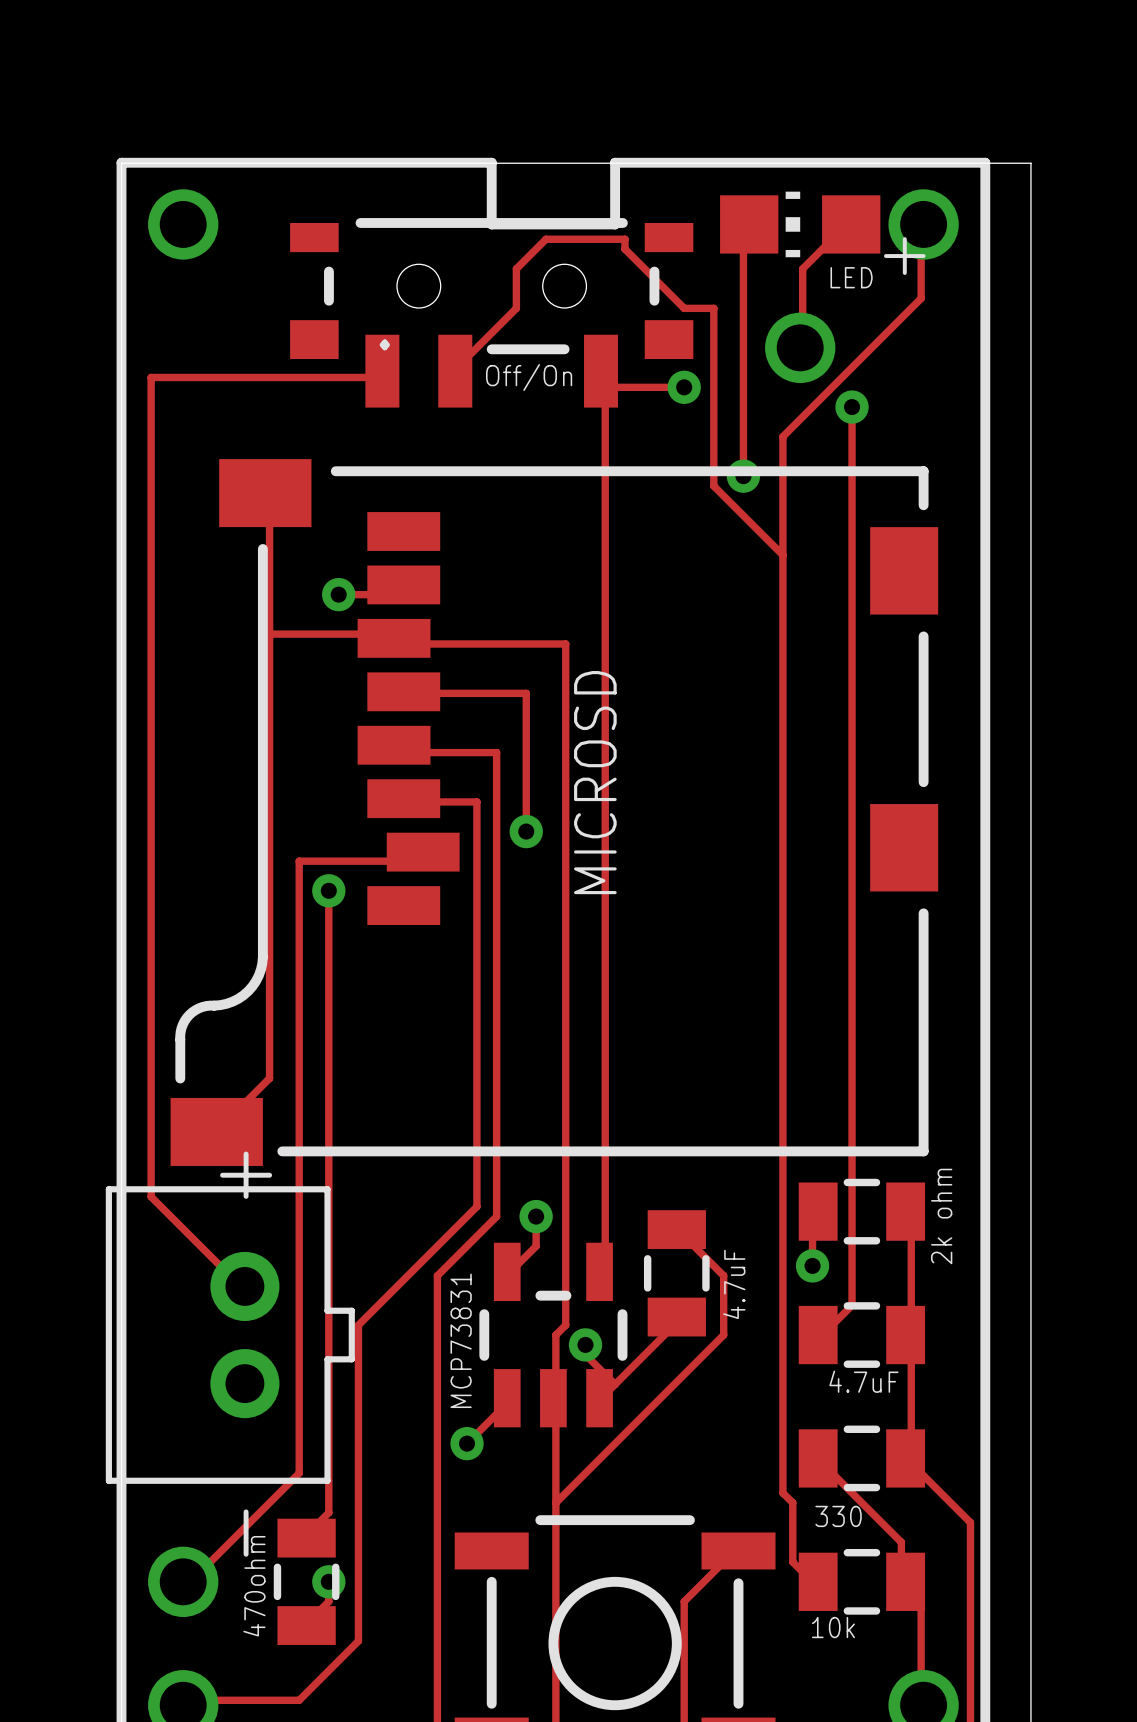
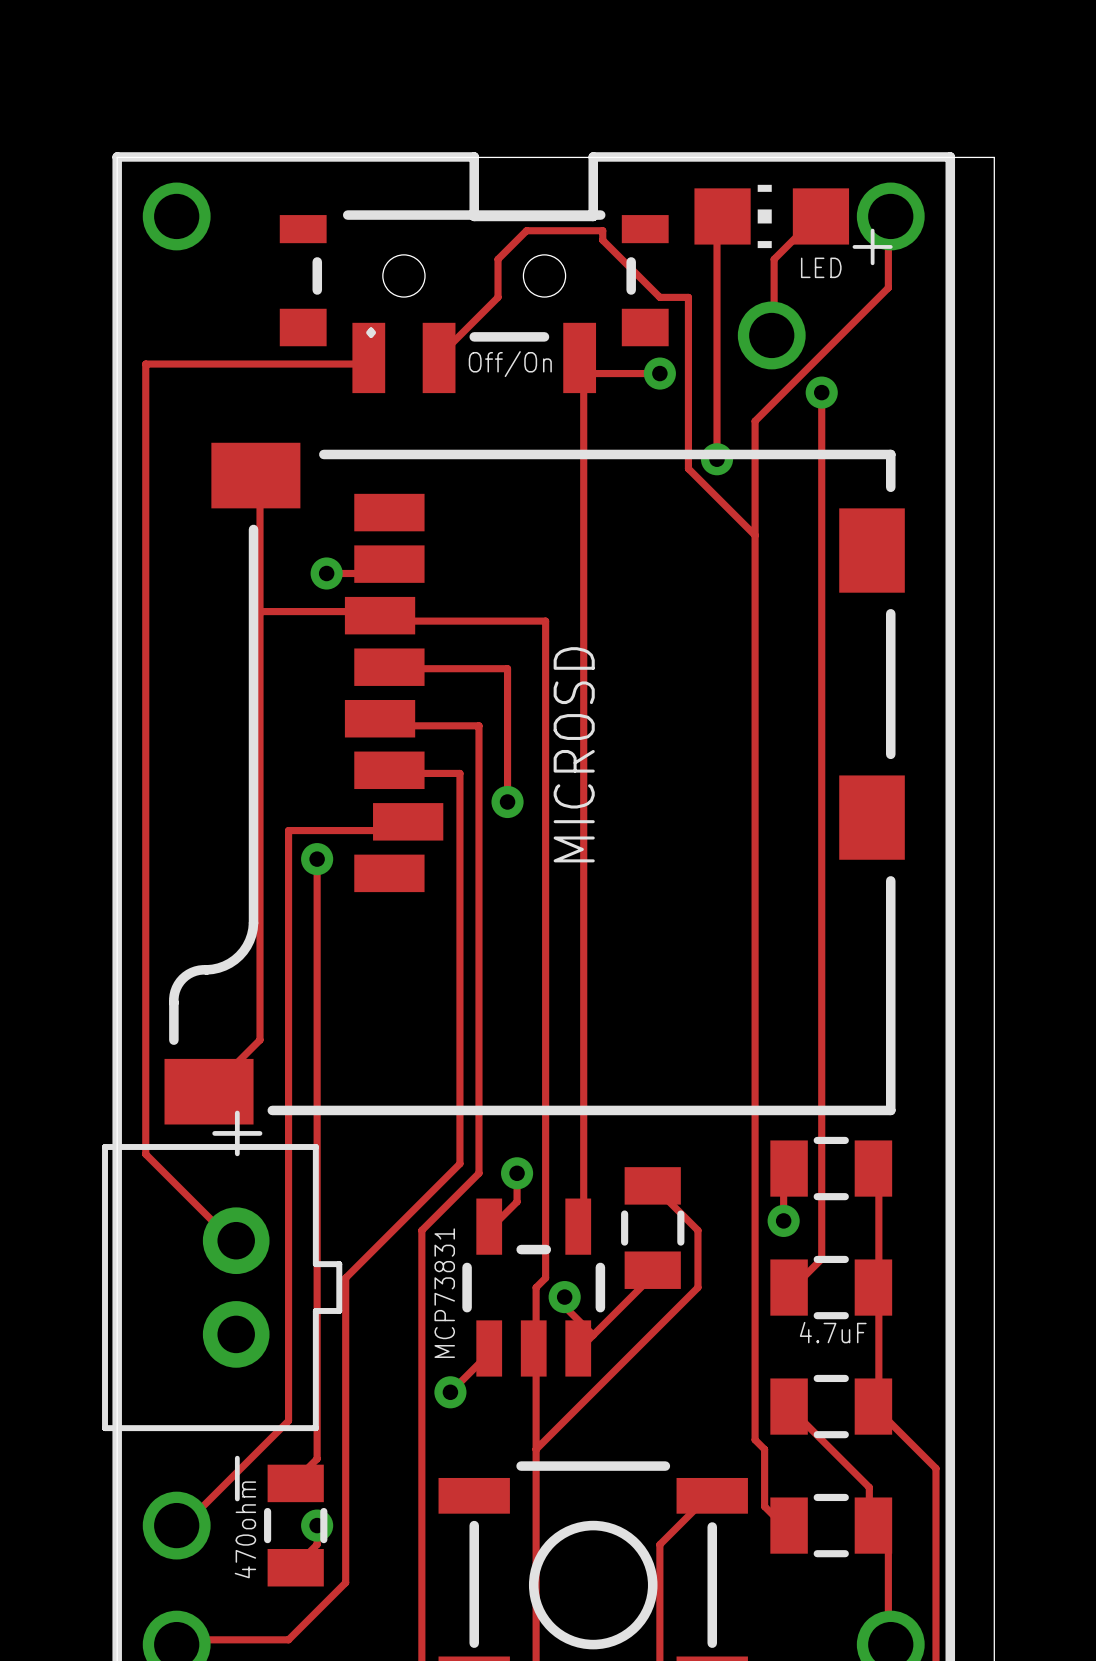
part value: 2k ohm (941, 1216) -> none
part value: 4.7uF (734, 1284) -> none
part value: 330 (838, 1516) -> none
part value: 10k (833, 1627) -> none

